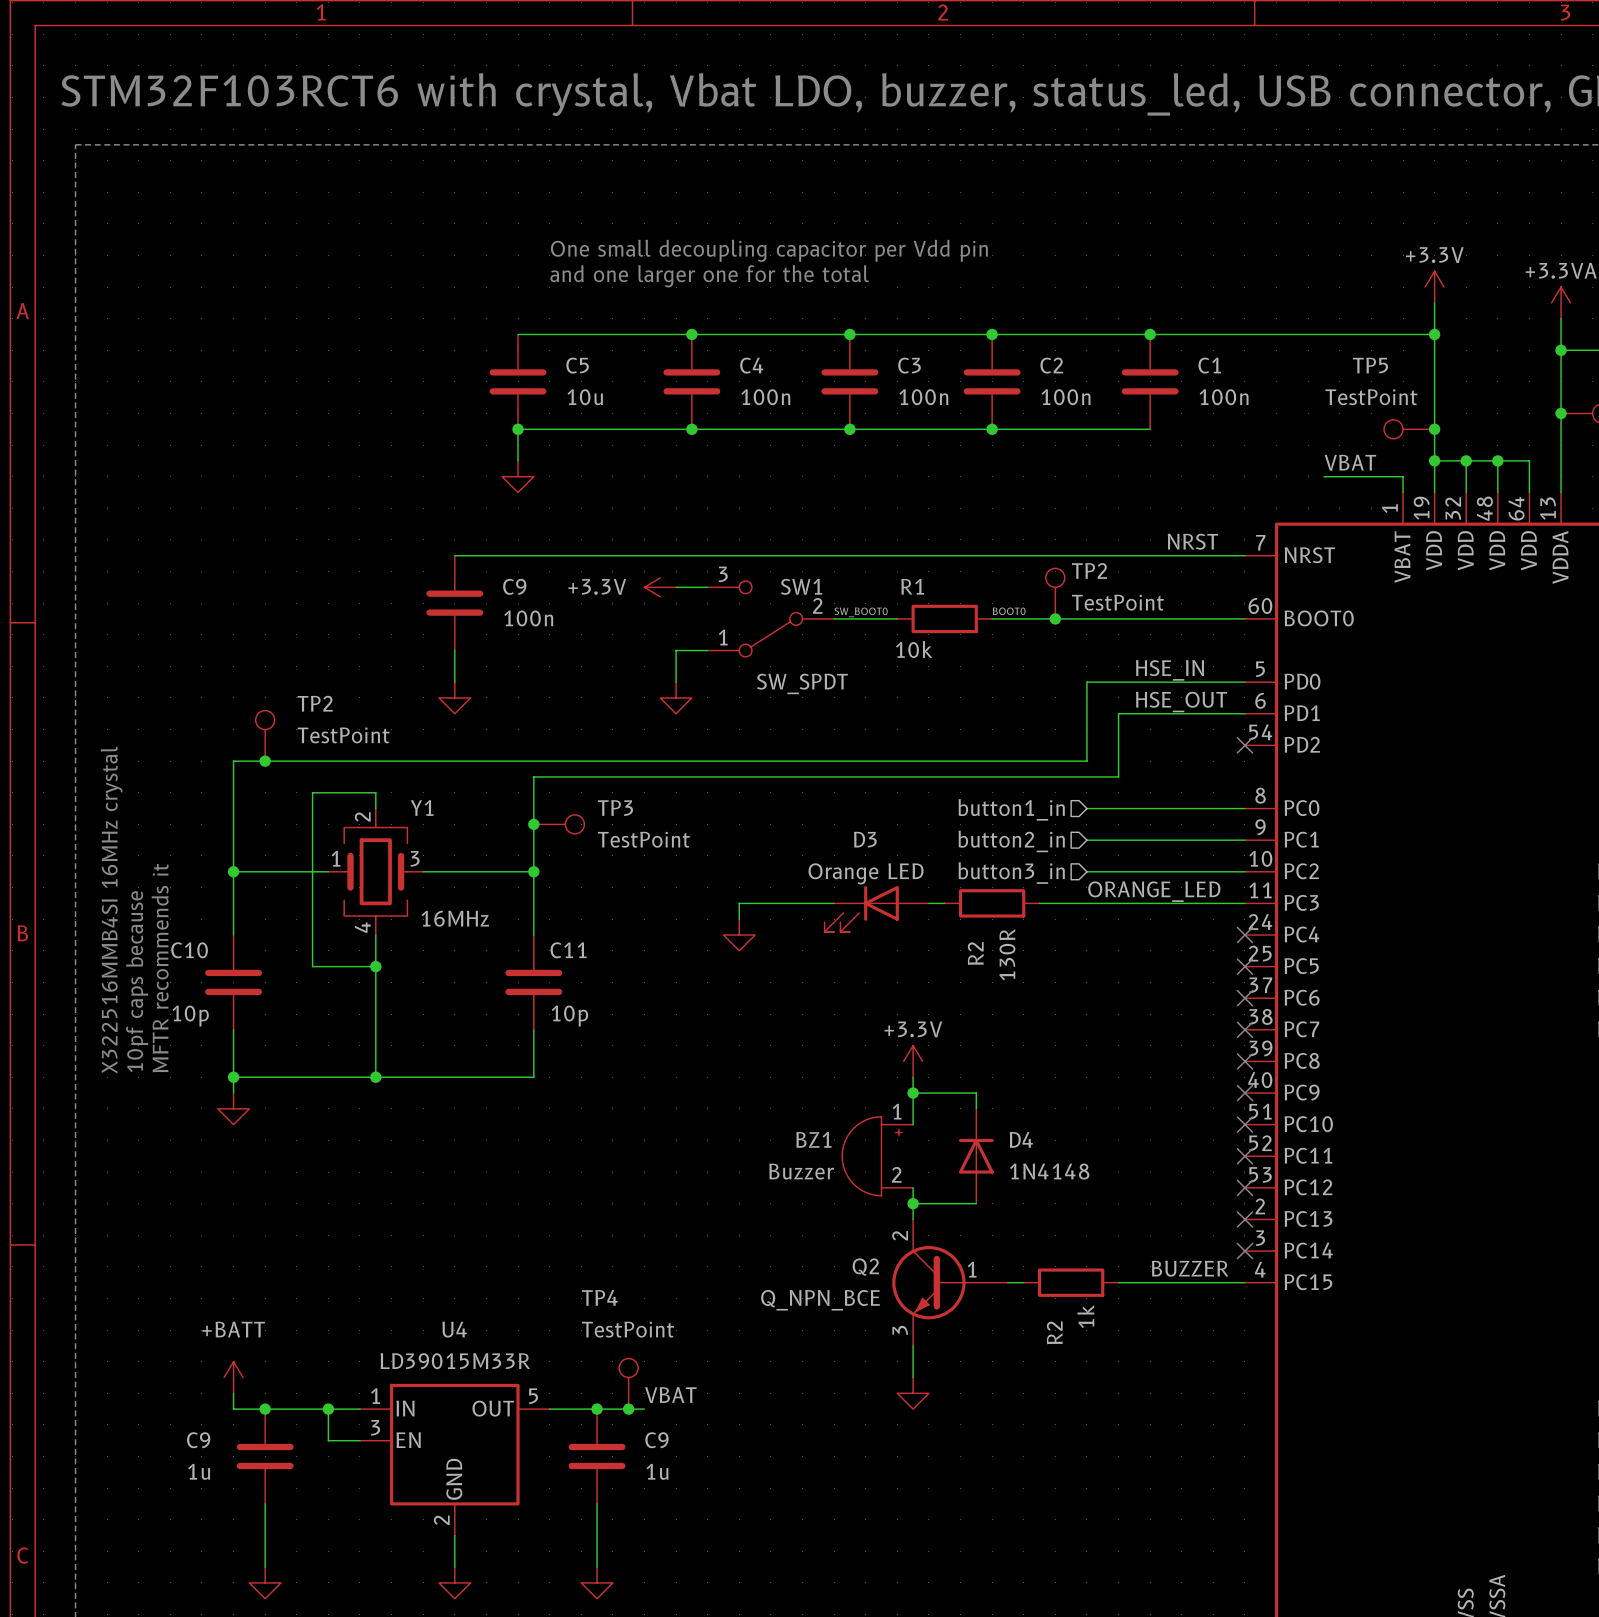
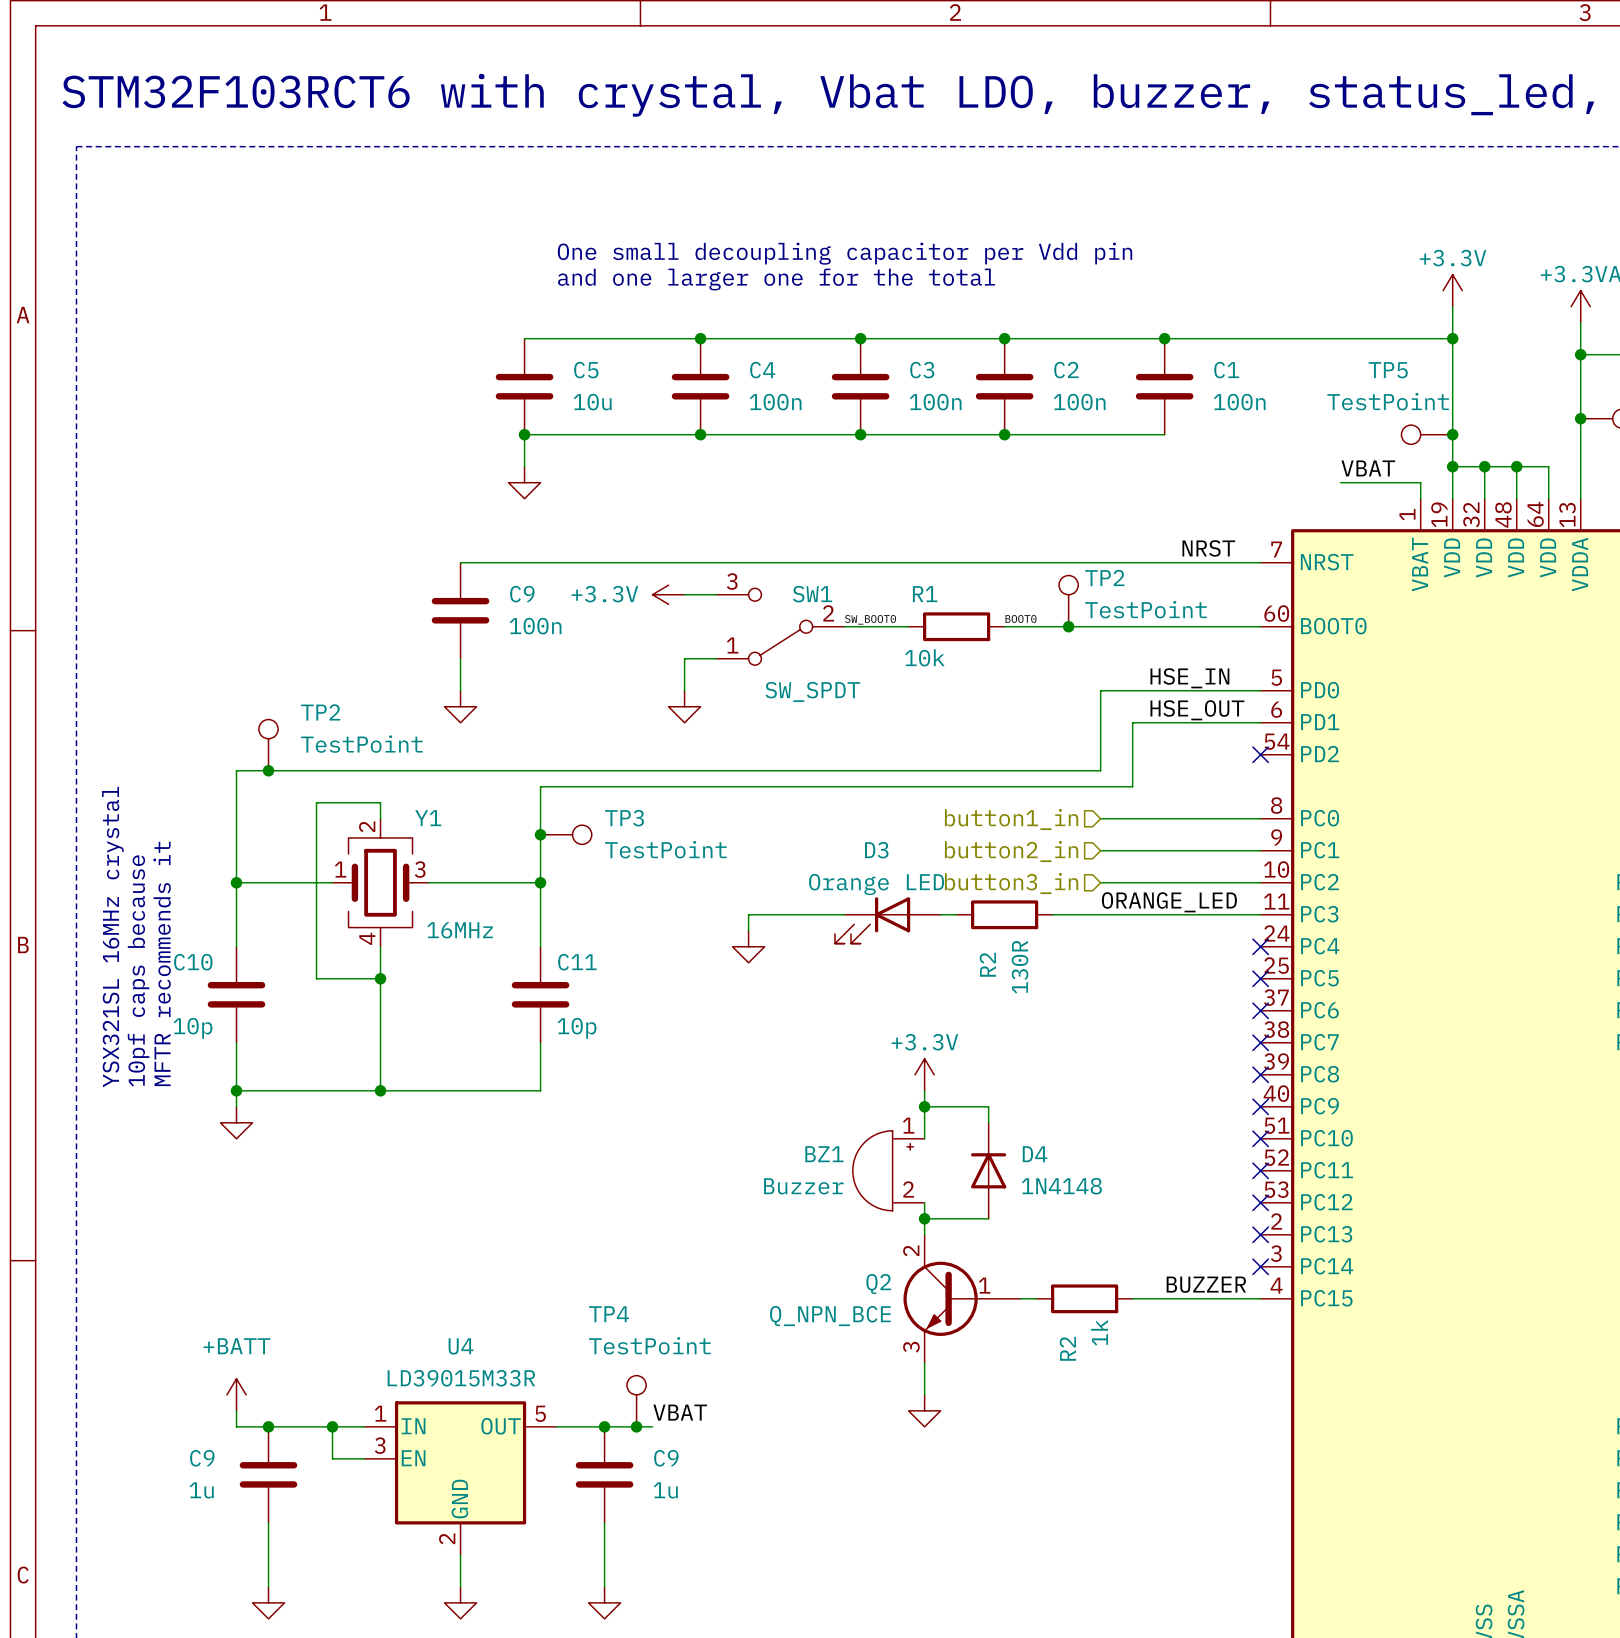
text: X322516MMB4SI 16MHz crystal (111, 909) -> YSX321SL 16MHz crystal (112, 937)

